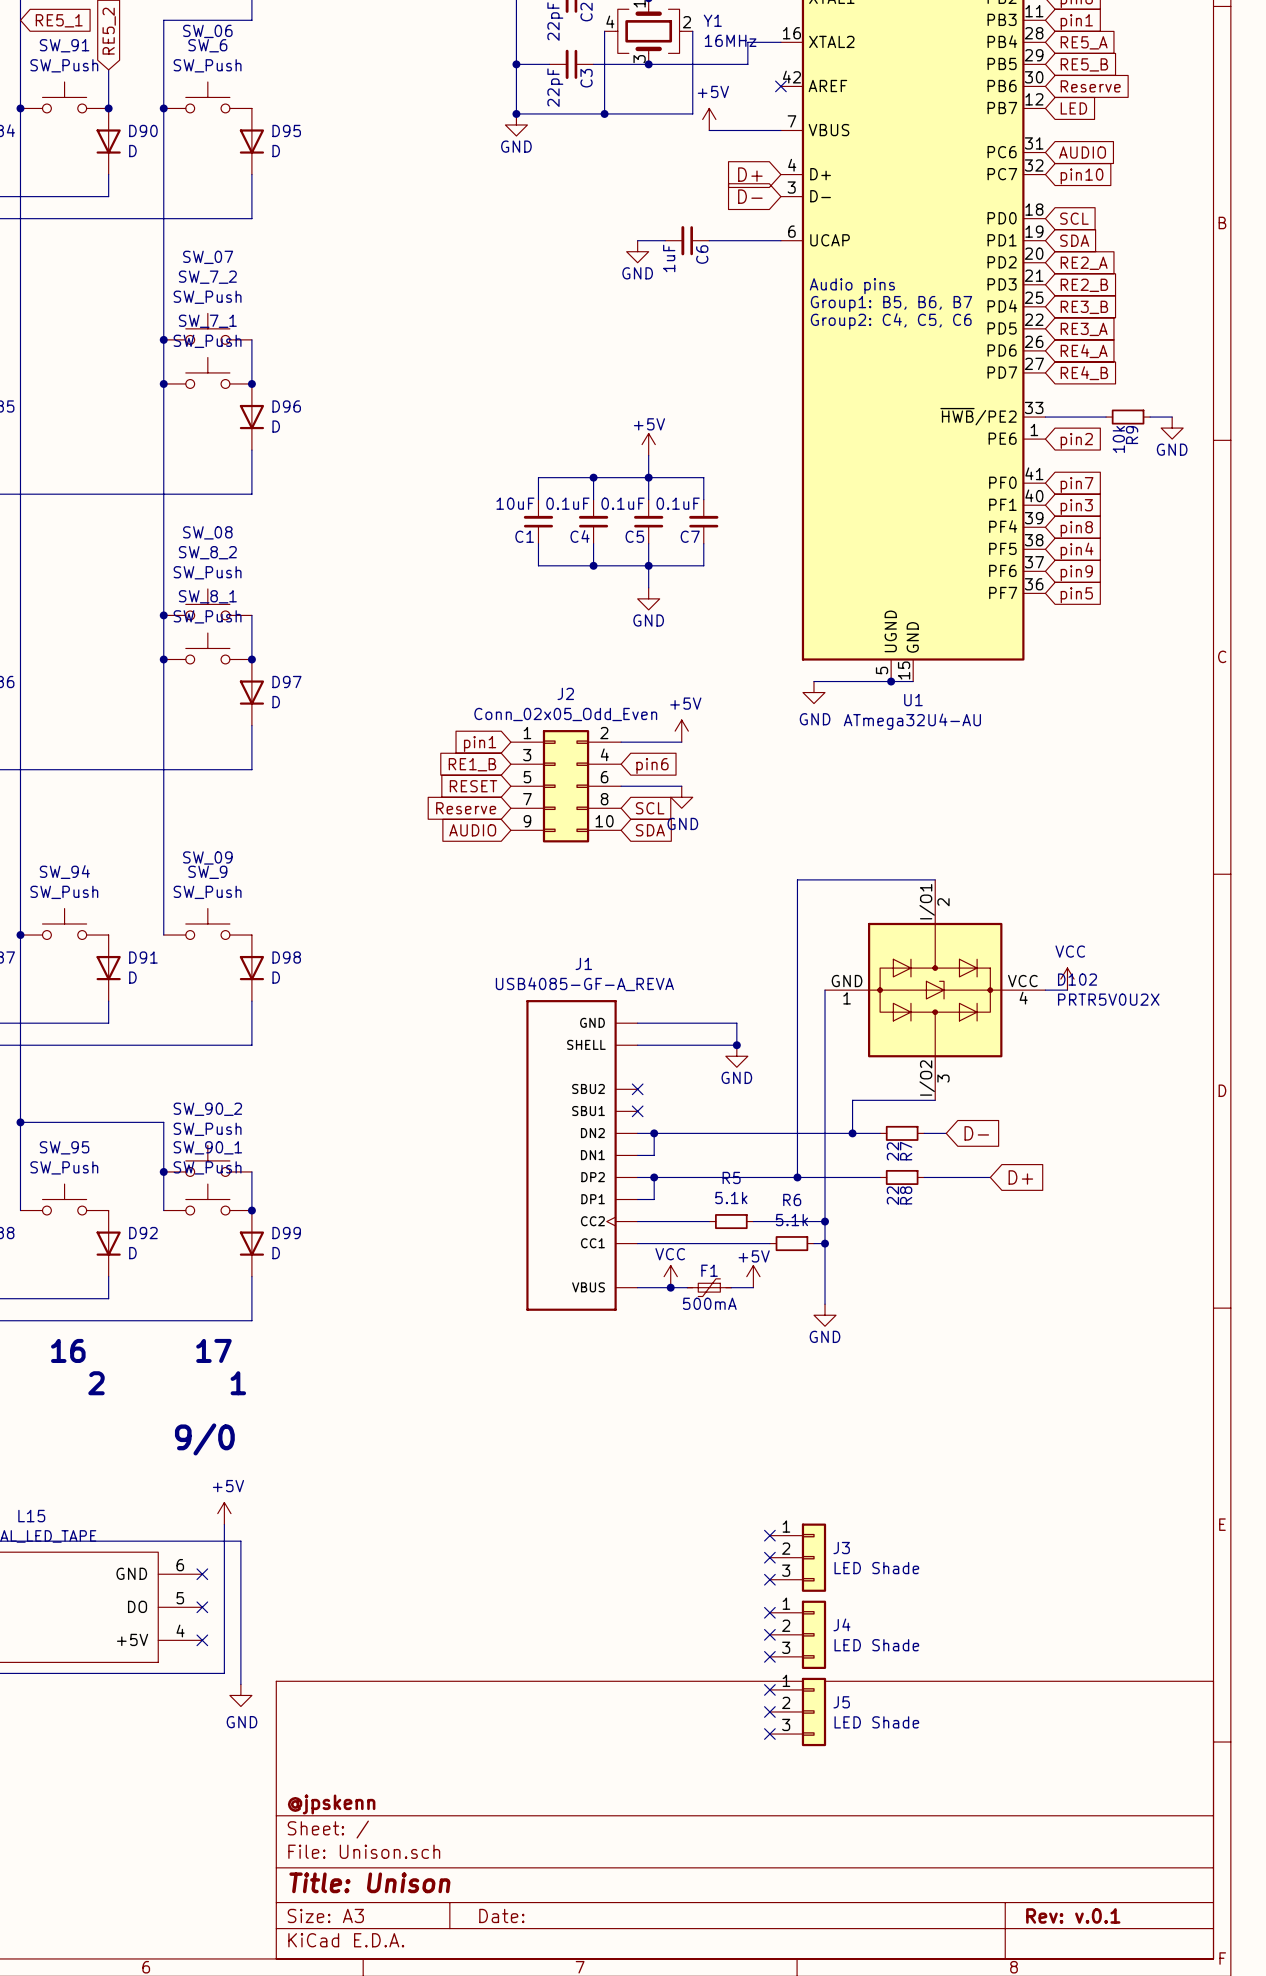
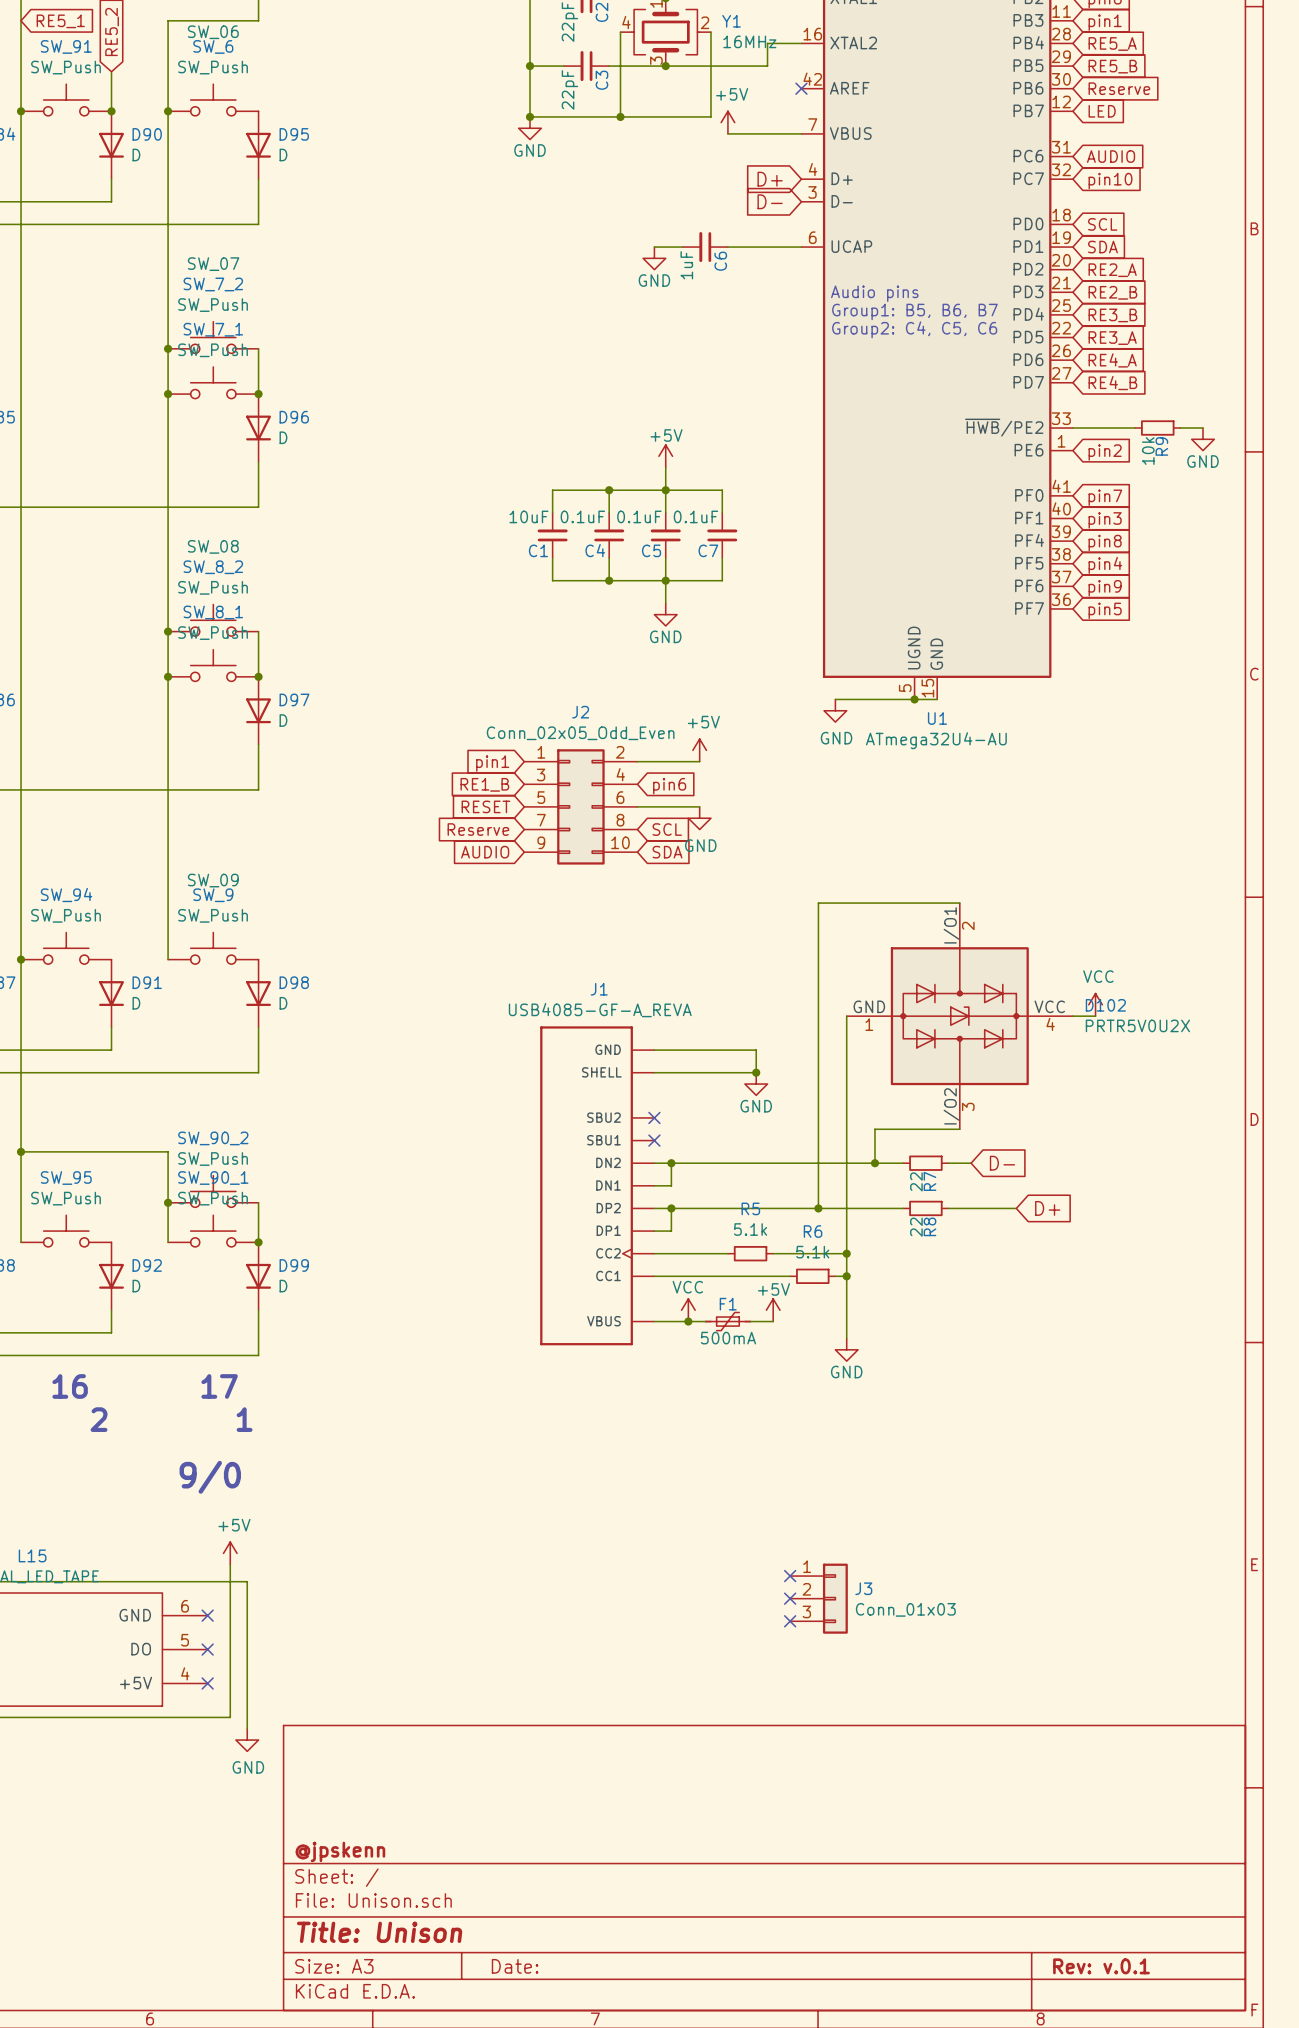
J3 value: LED Shade (876, 1568) -> Conn_01x03 (905, 1609)
no-connect mark: (769, 1612) -> none
no-connect mark: (769, 1634) -> none
J4: LED Shade (798, 1634) -> none
no-connect mark: (769, 1656) -> none
no-connect mark: (769, 1689) -> none
no-connect mark: (769, 1711) -> none
J5: LED Shade (798, 1711) -> none
no-connect mark: (769, 1734) -> none

